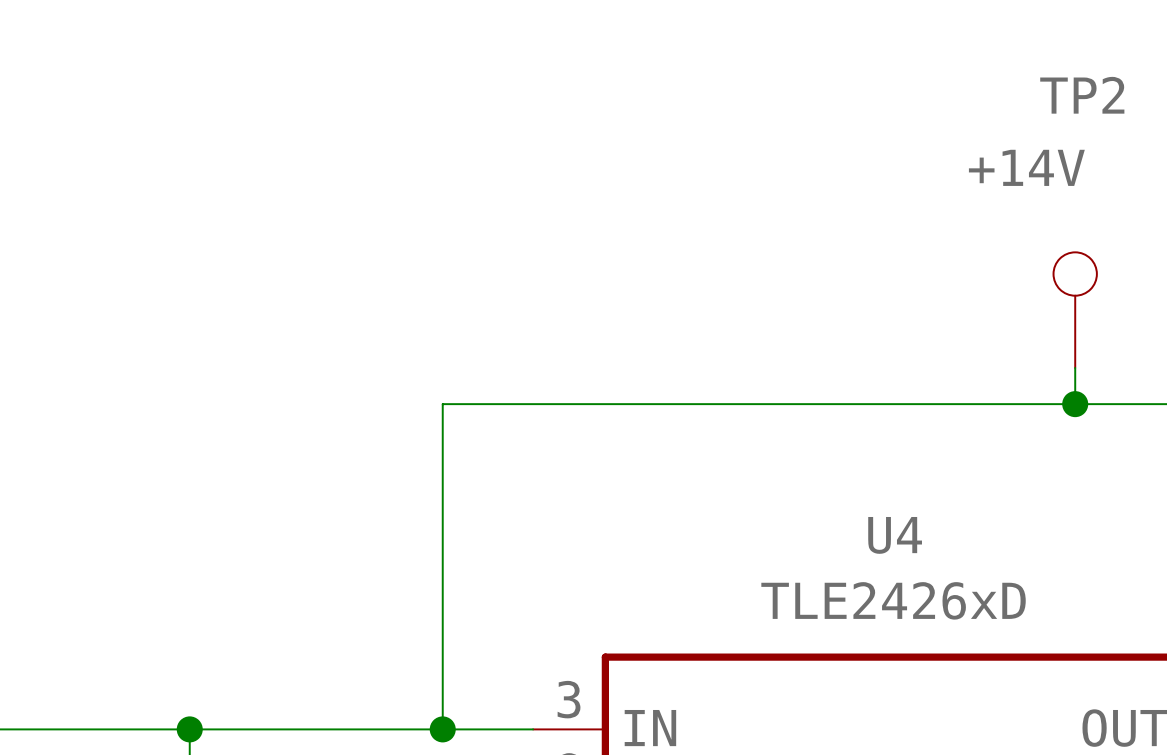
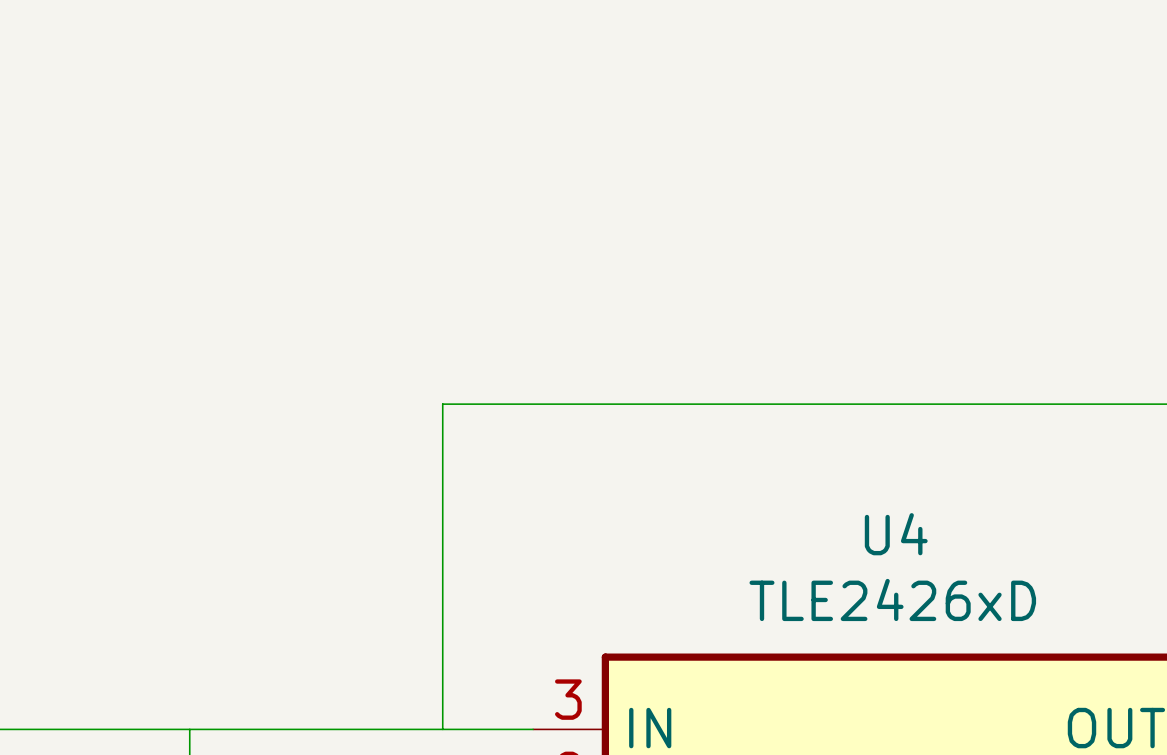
TP2: +14V (1075, 310) -> none
wire: (1075, 367) (1075, 404) -> none
junction: (1075, 404) -> none
junction: (189, 729) -> none
junction: (442, 729) -> none

